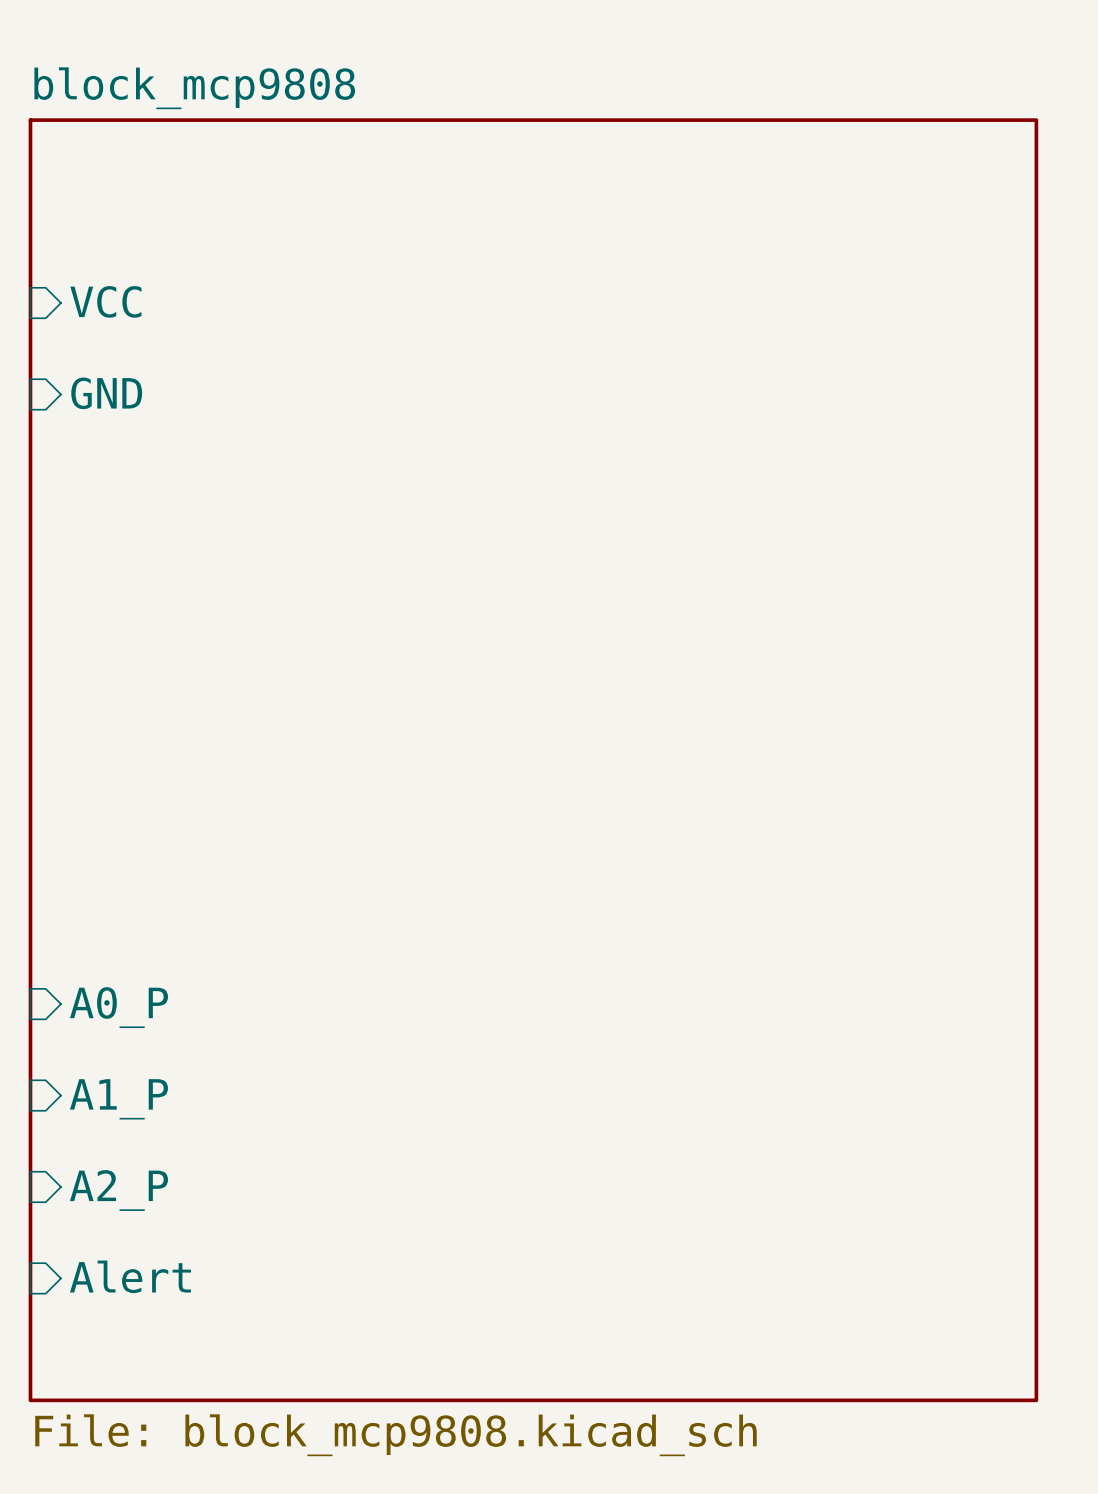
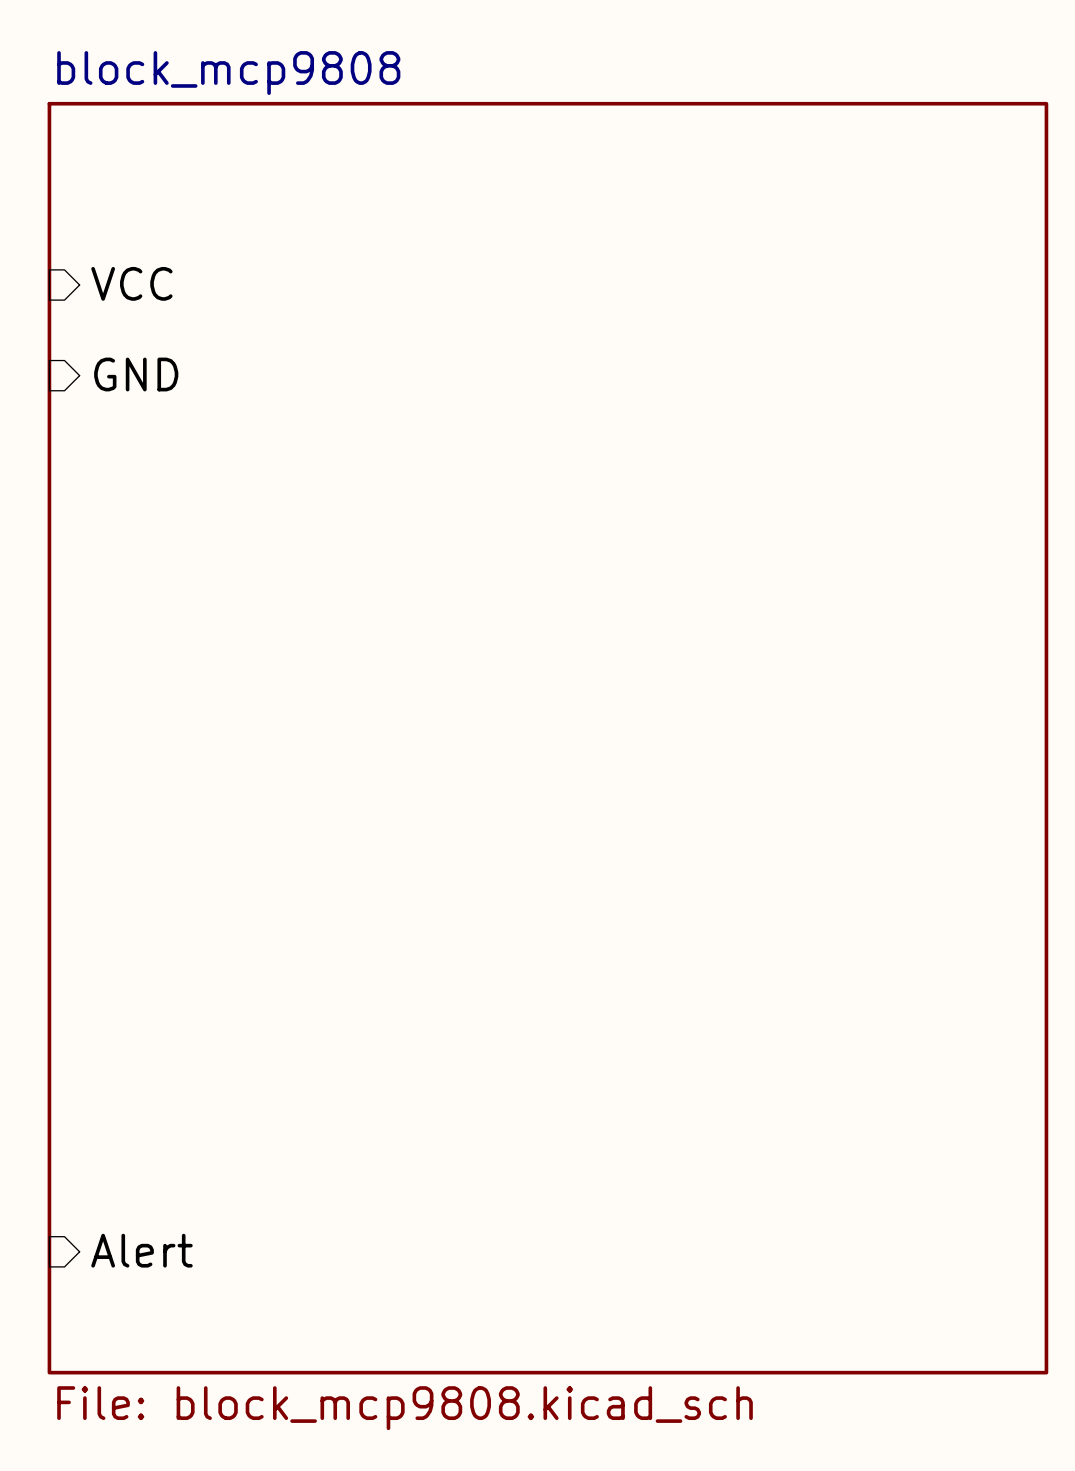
sheet pin: A0_P (118, 1007) -> none
sheet pin: A1_P (118, 1099) -> none
sheet pin: A2_P (118, 1190) -> none

